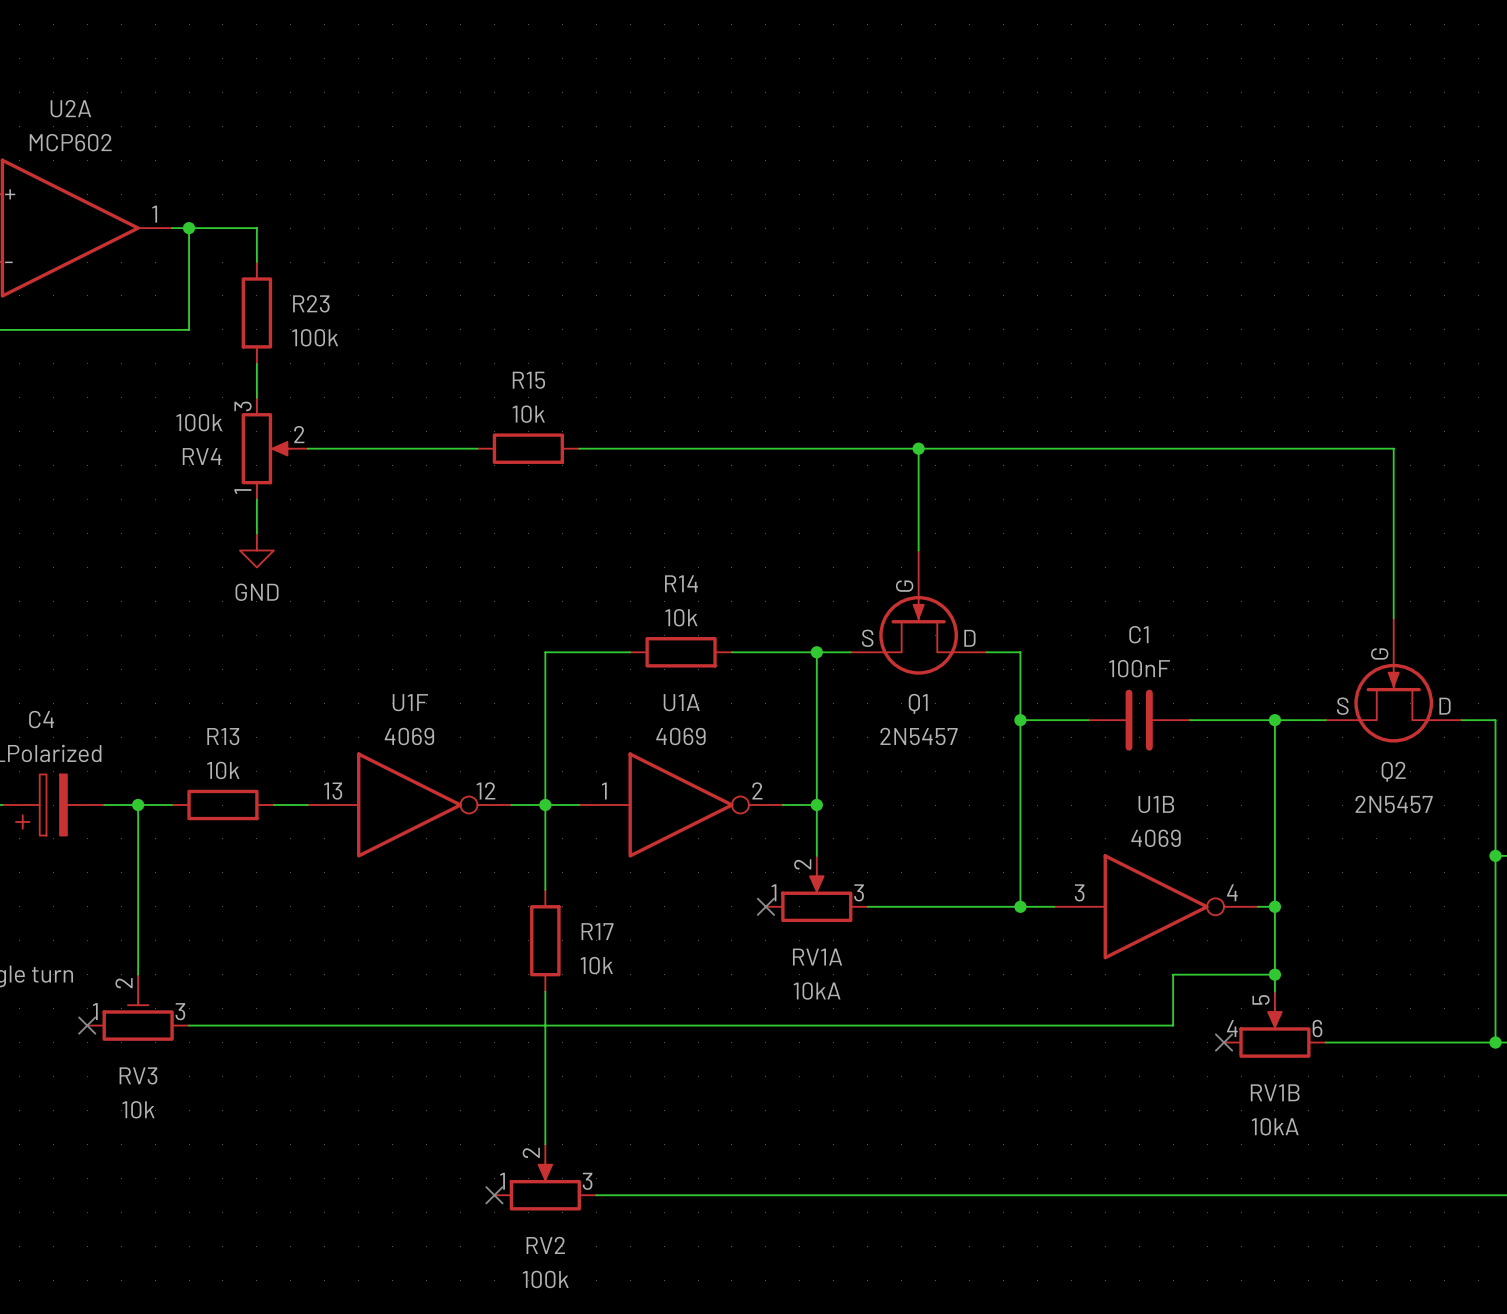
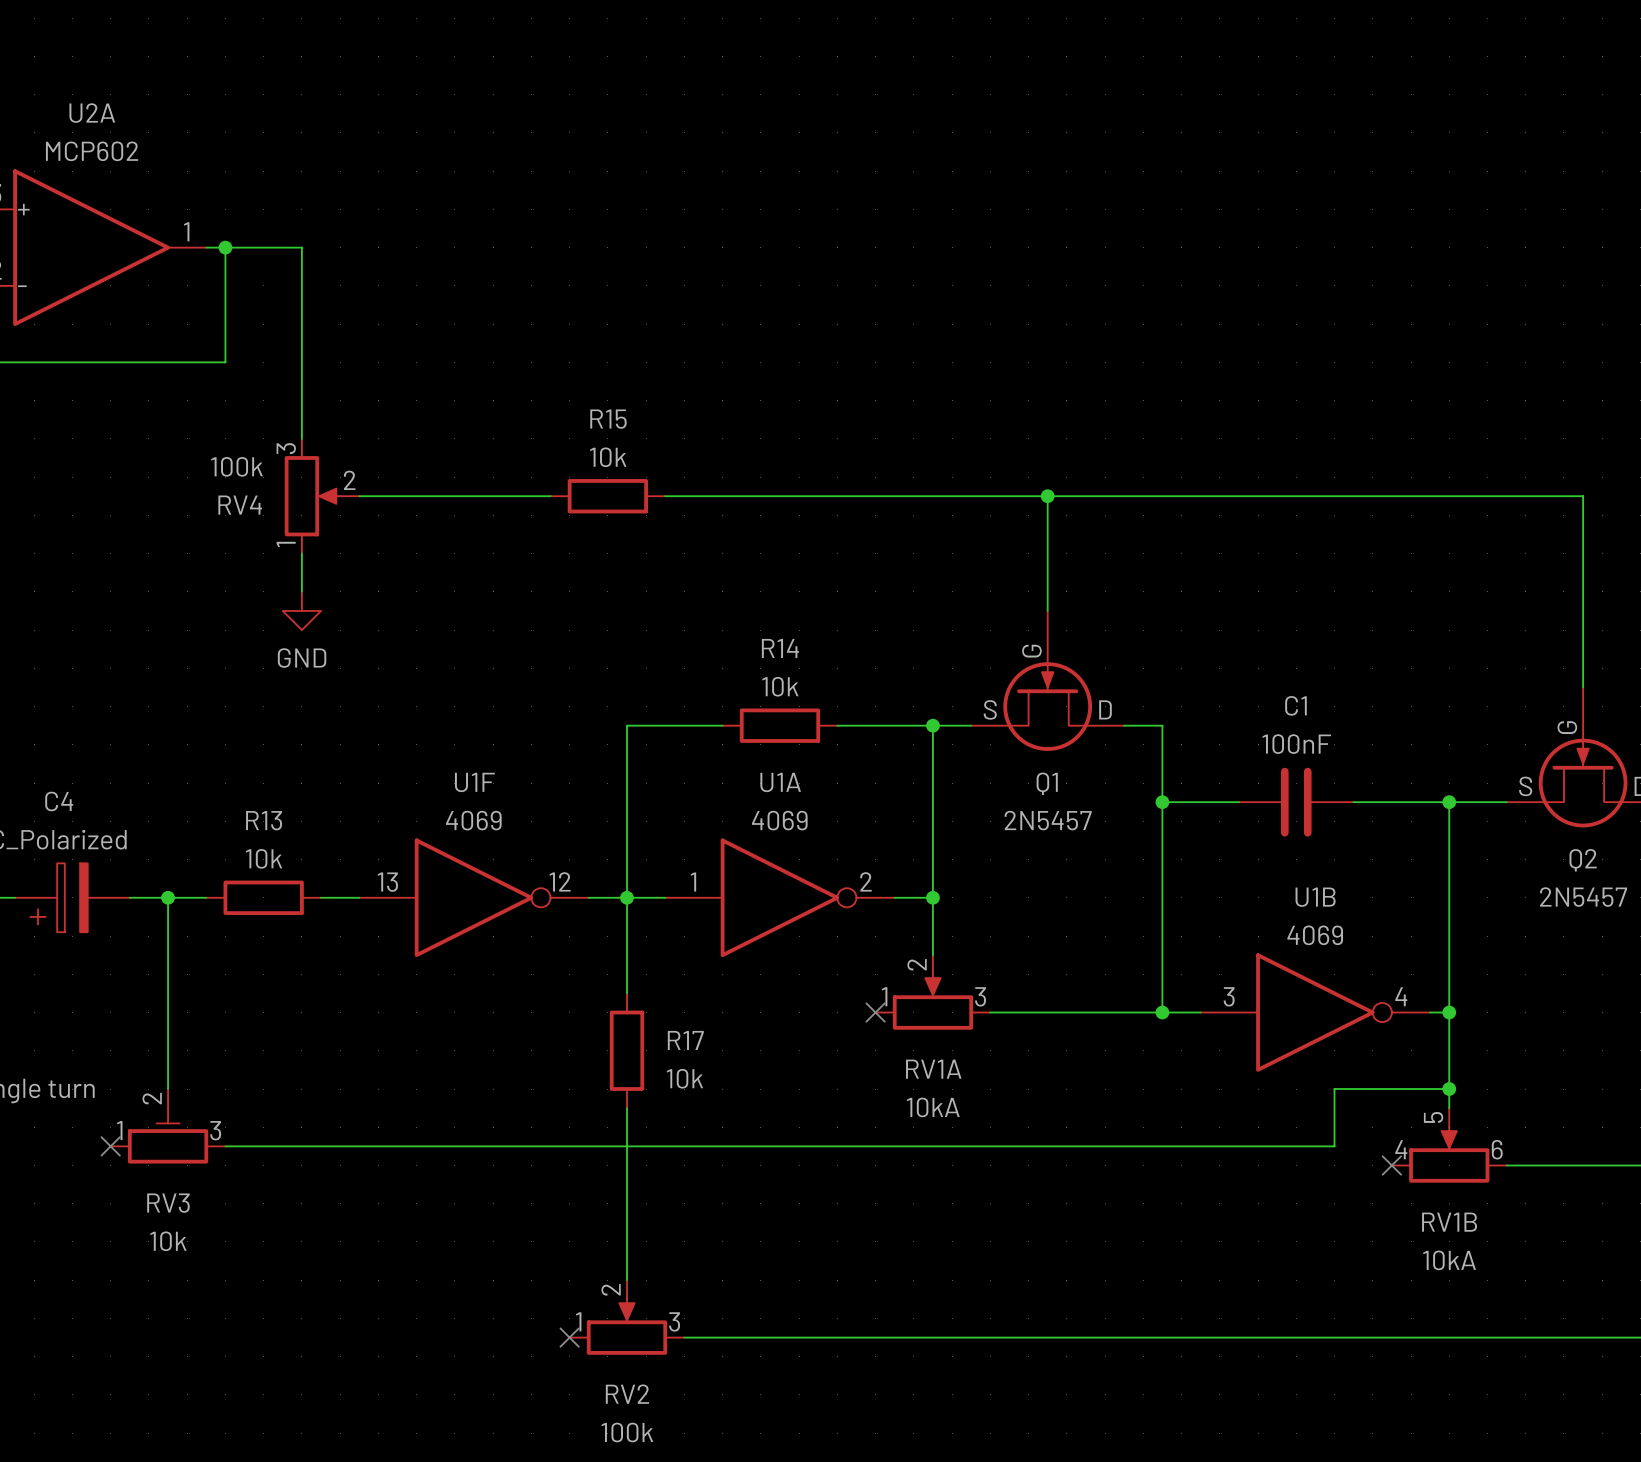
wire: none -> (301, 285) (301, 400)
R23: 100k (256, 312) -> none

